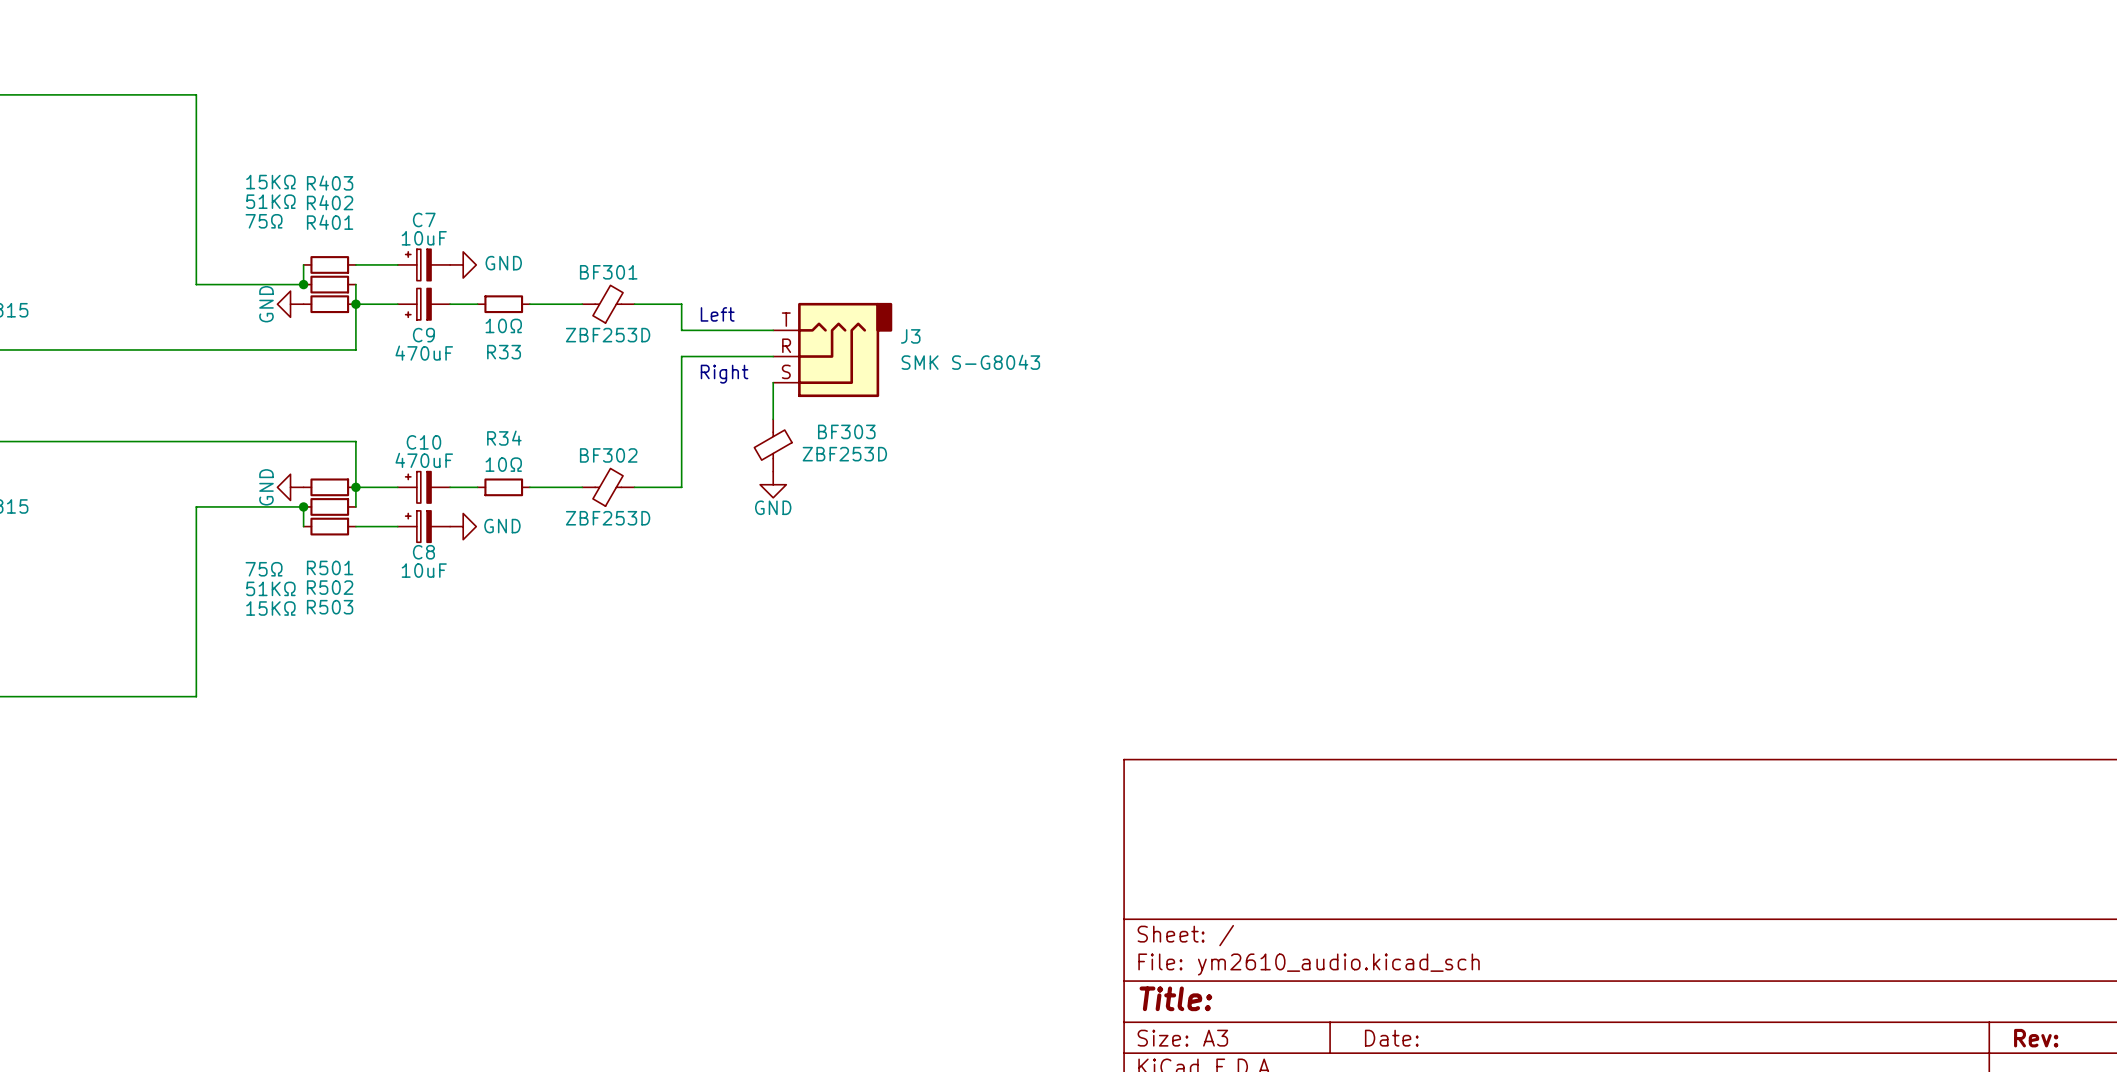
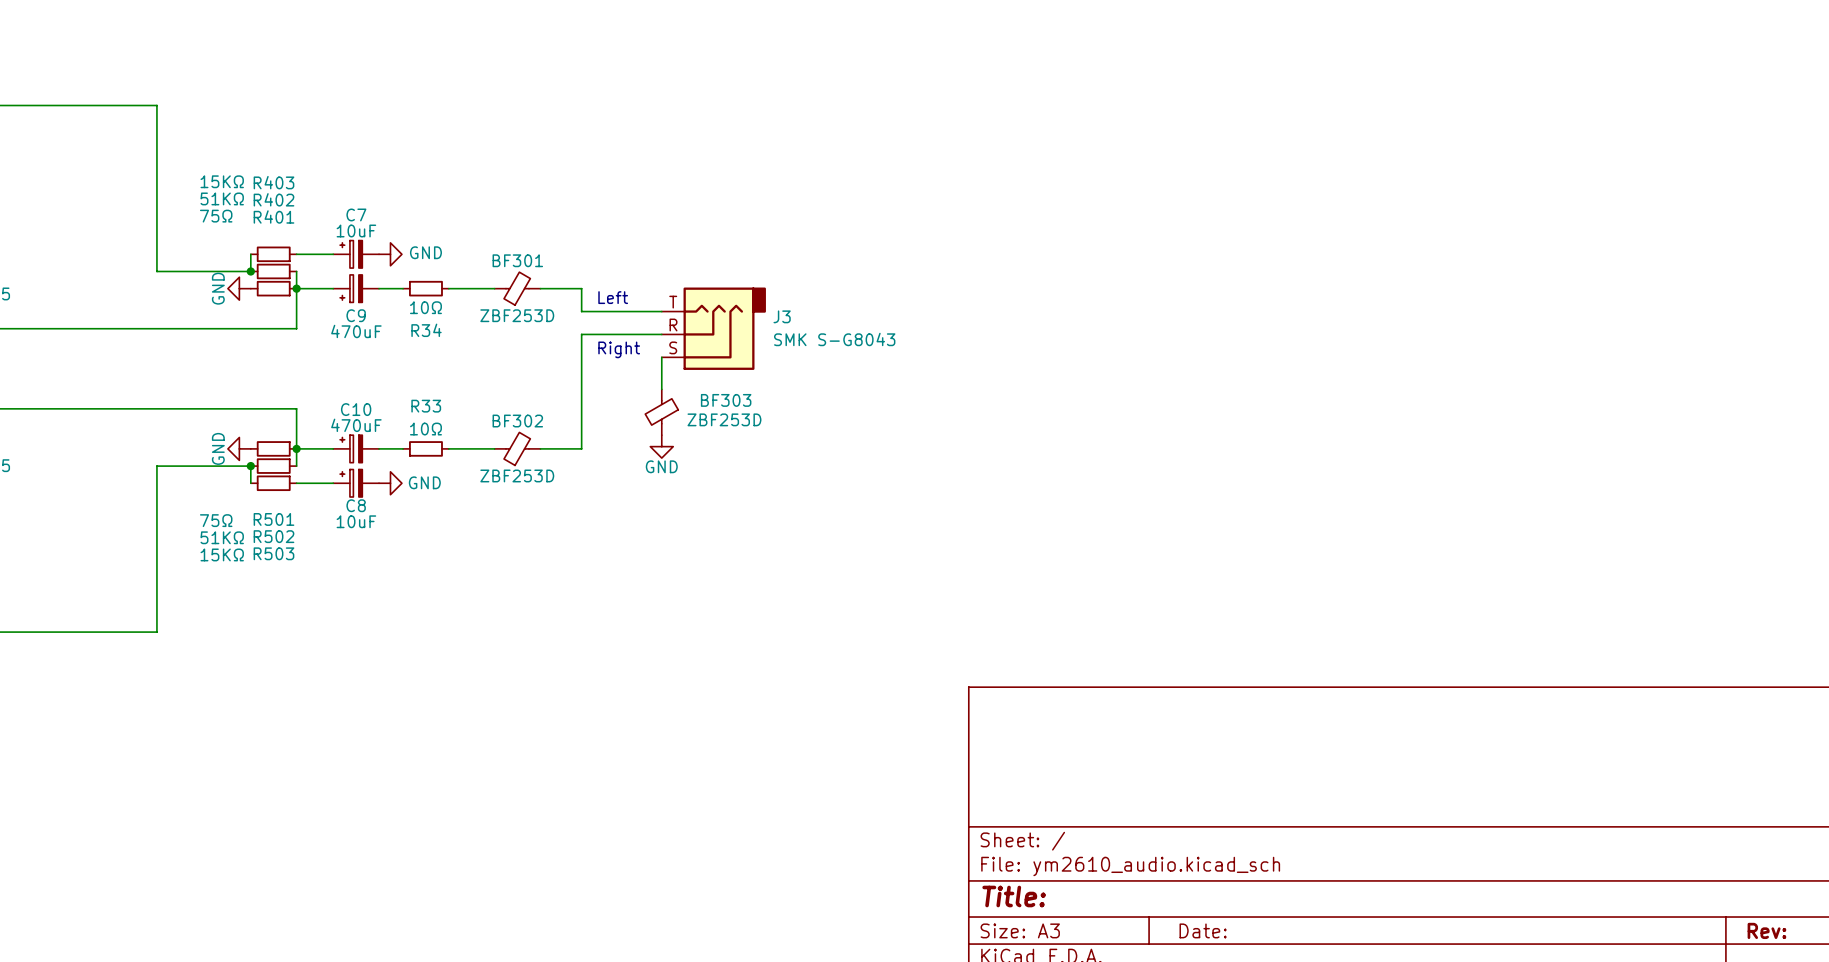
R33 name: R33 (504, 352) -> R34 (426, 330)
R34 name: R34 (504, 438) -> R33 (426, 406)

